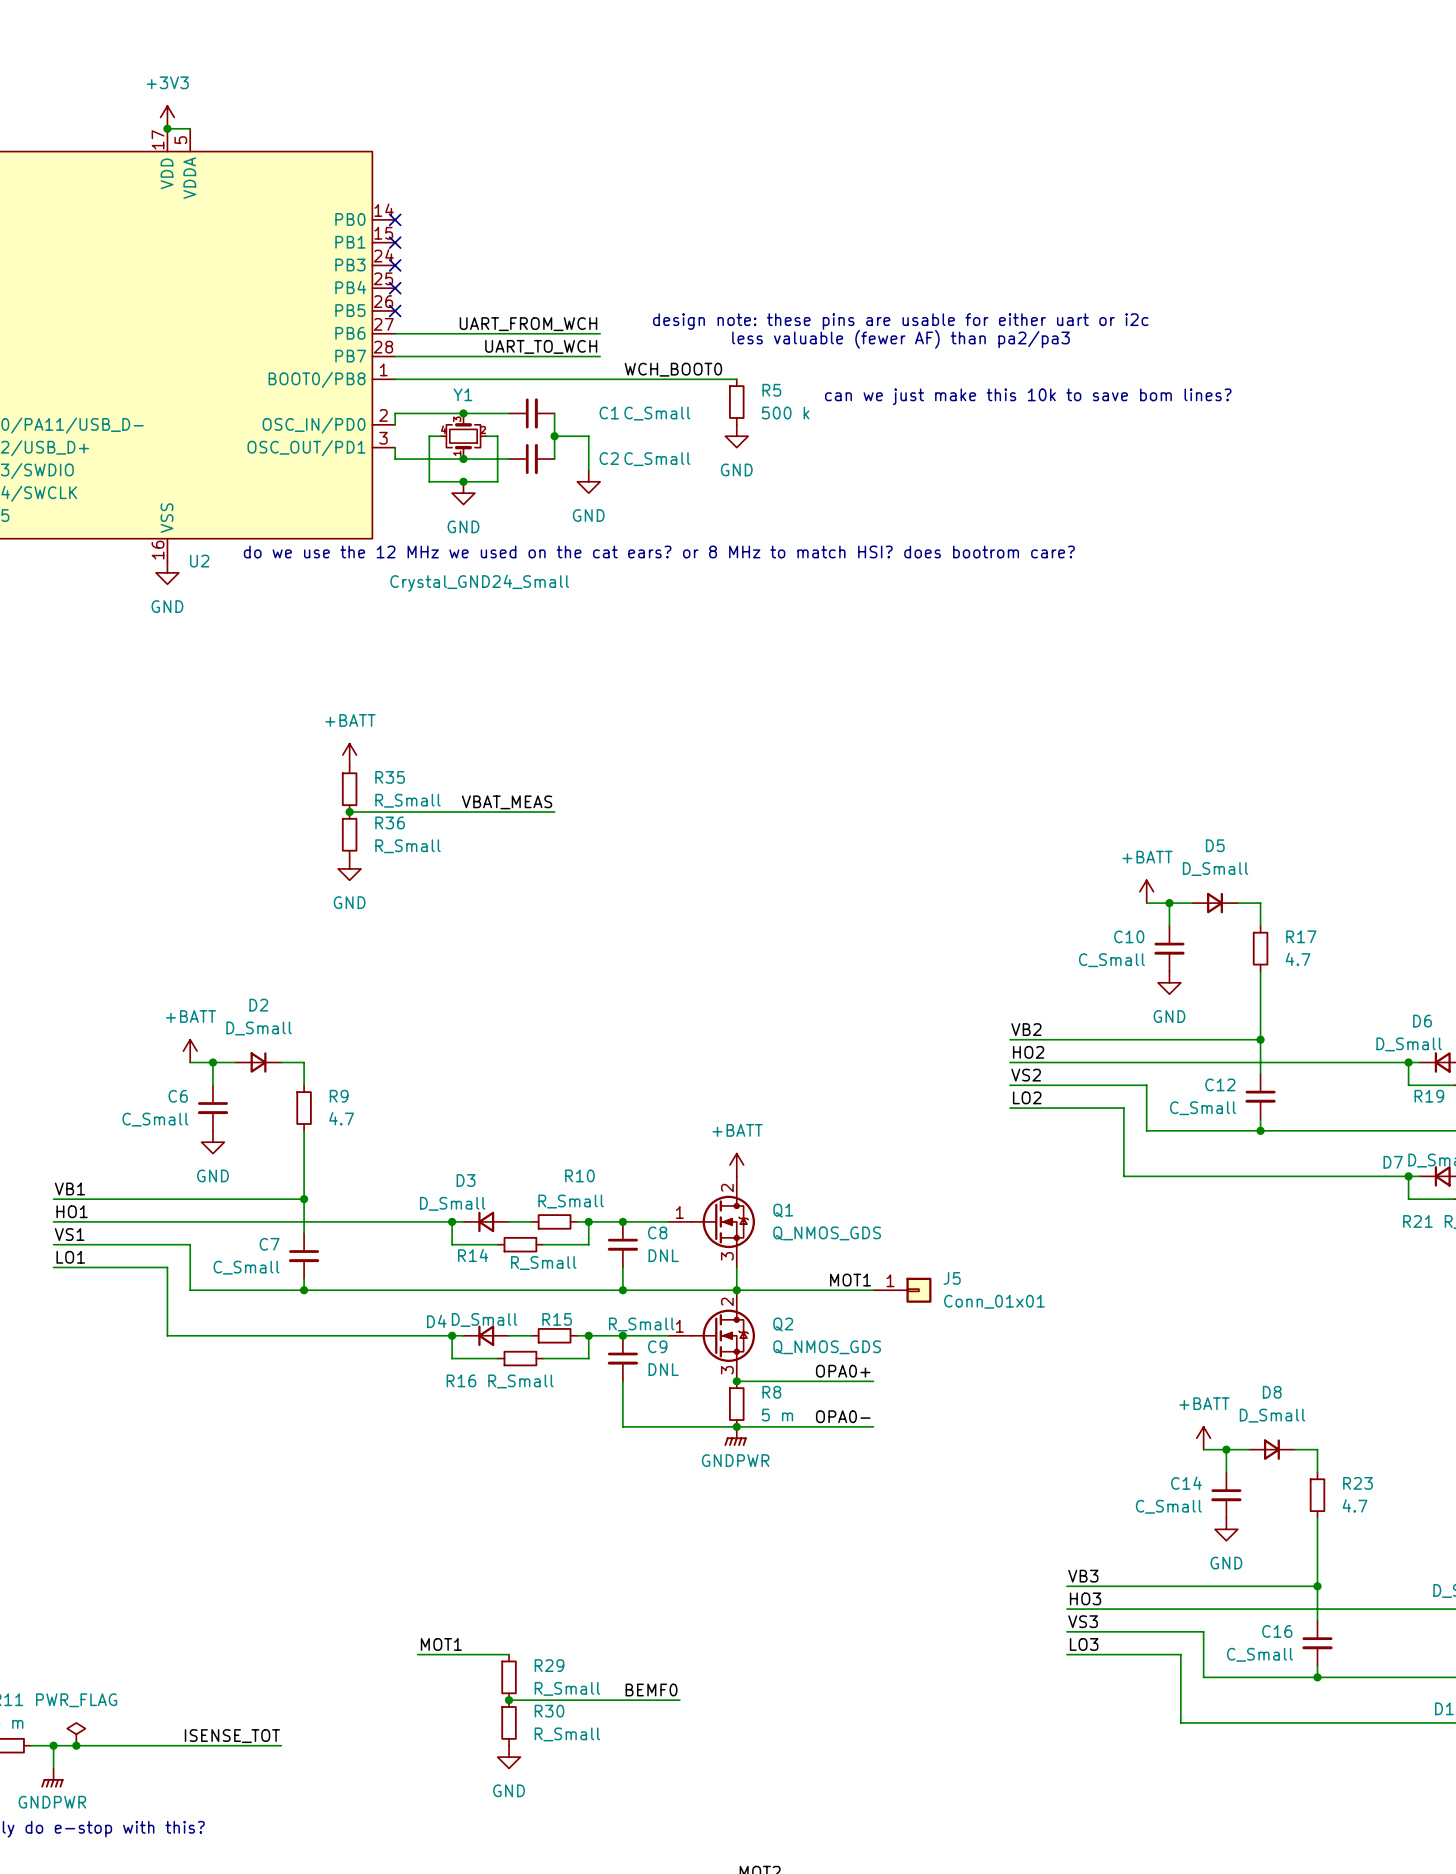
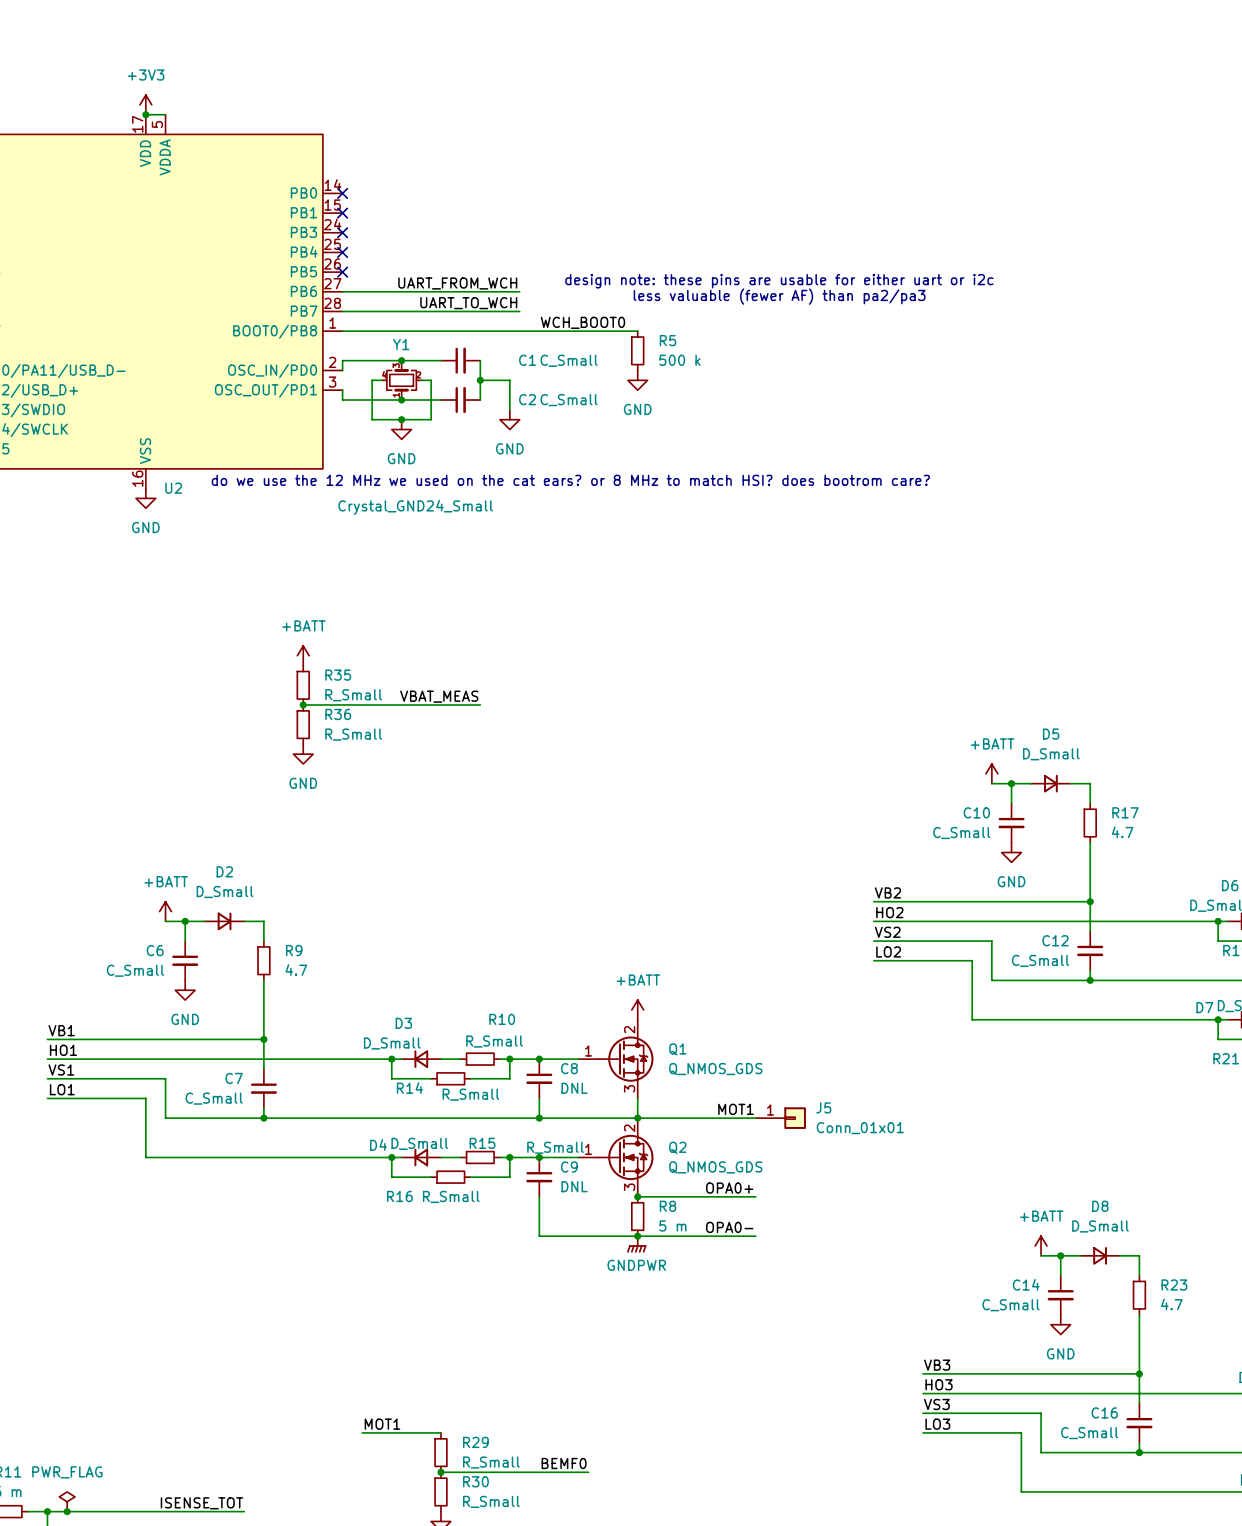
text: can we just make this 10k to save bom lines? (1028, 396) -> none

